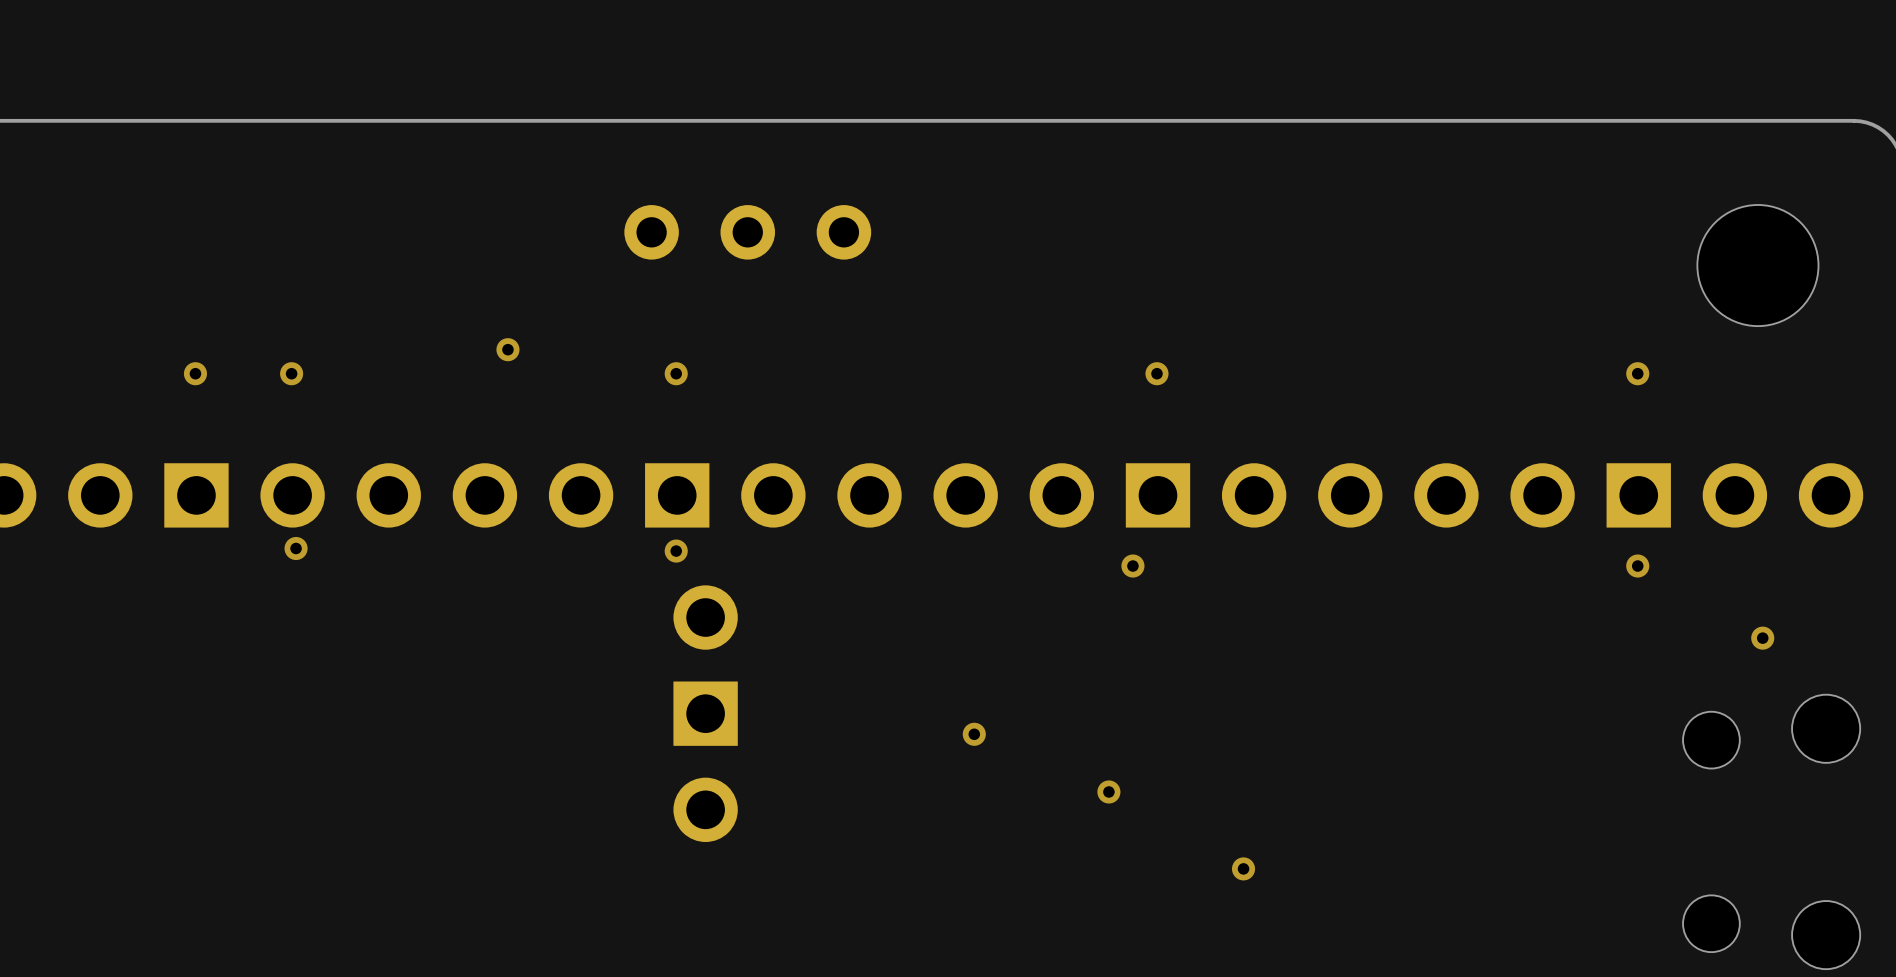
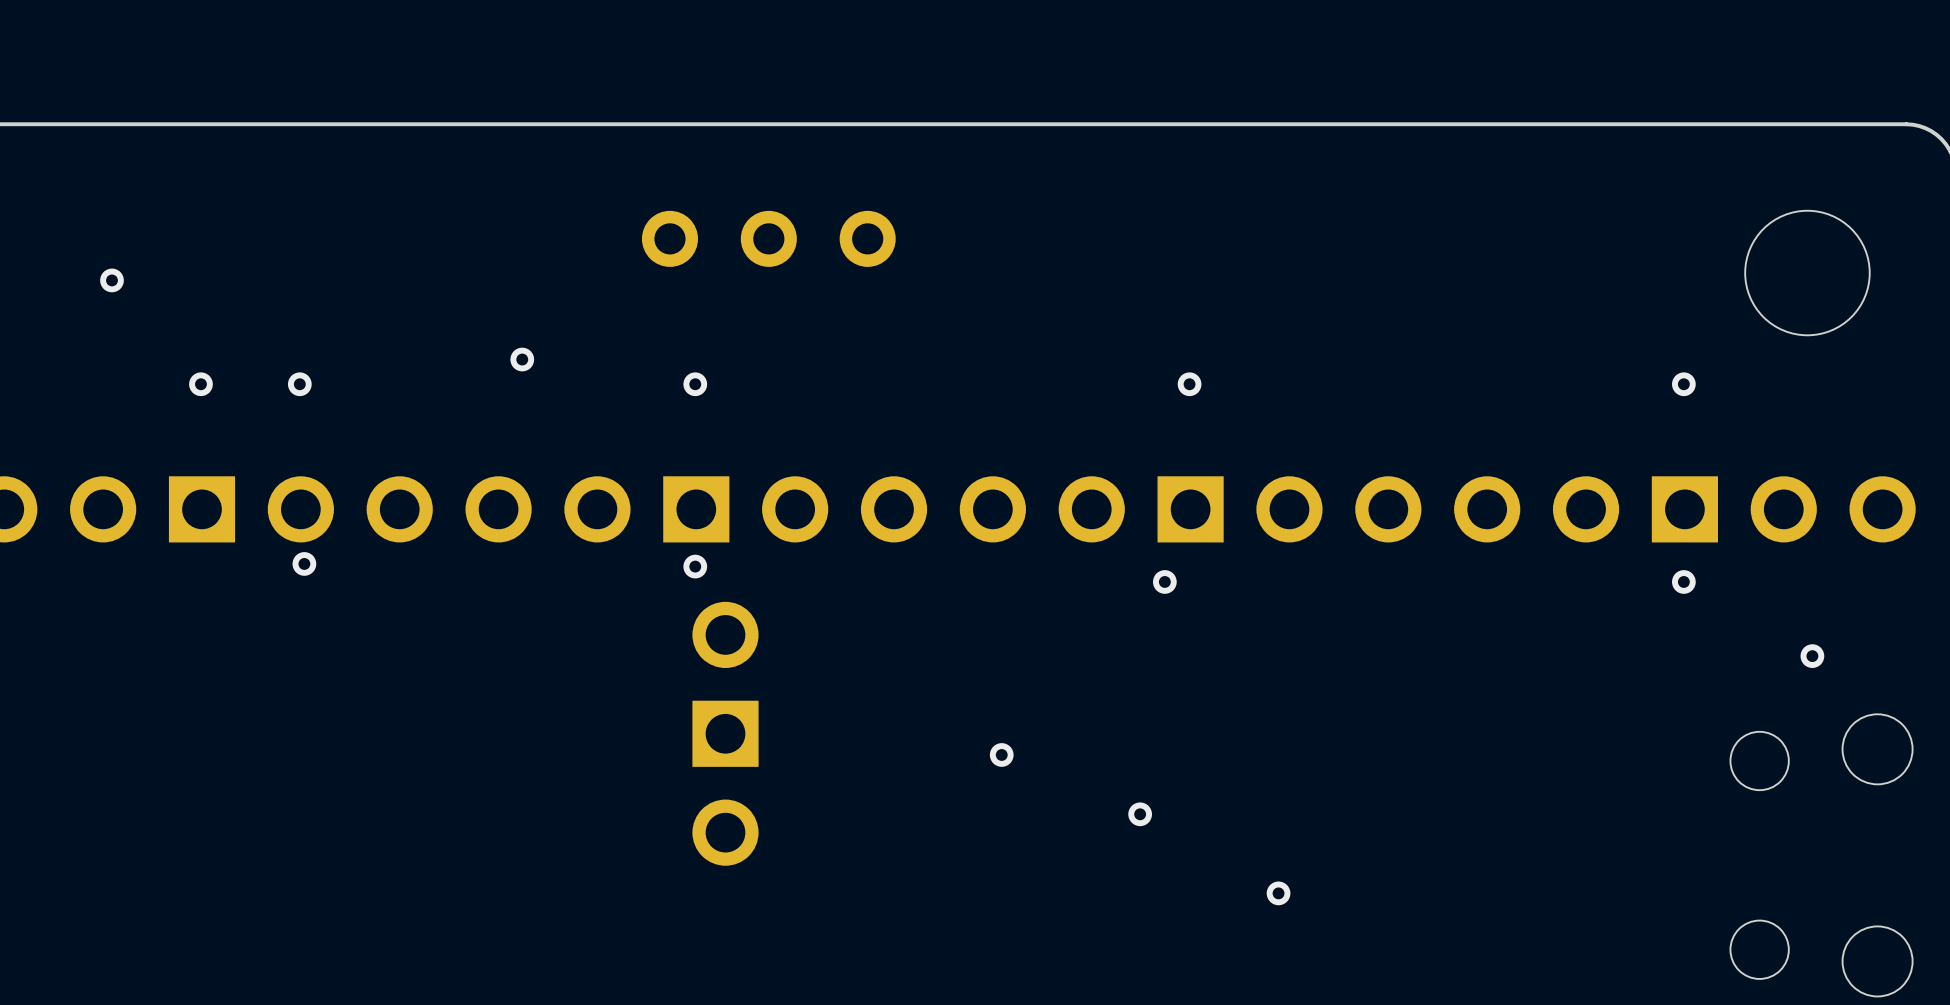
via: none -> (111, 280)

